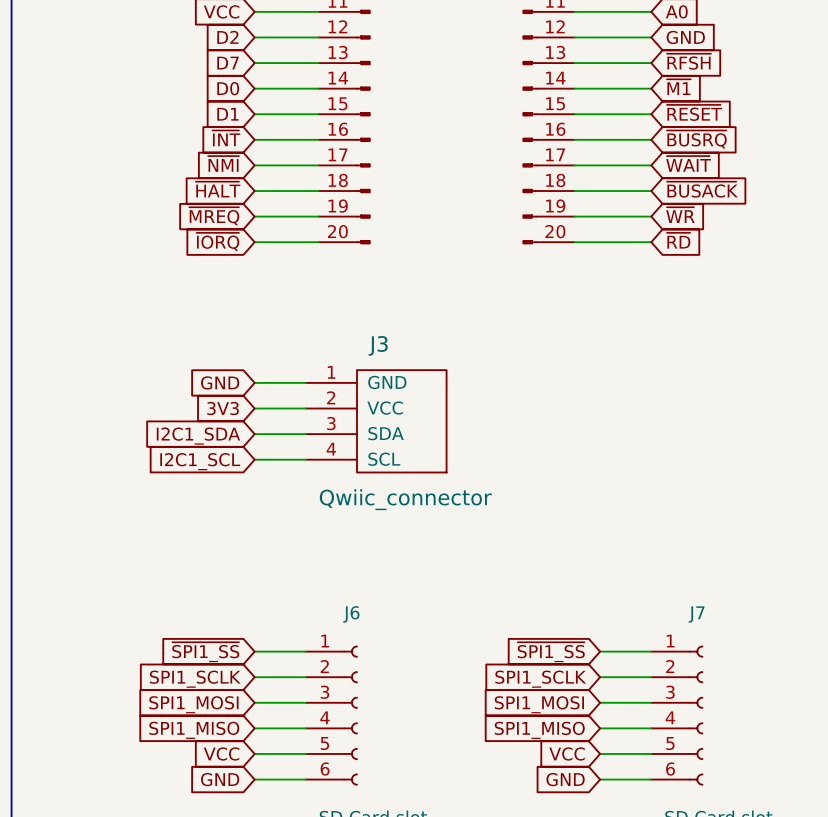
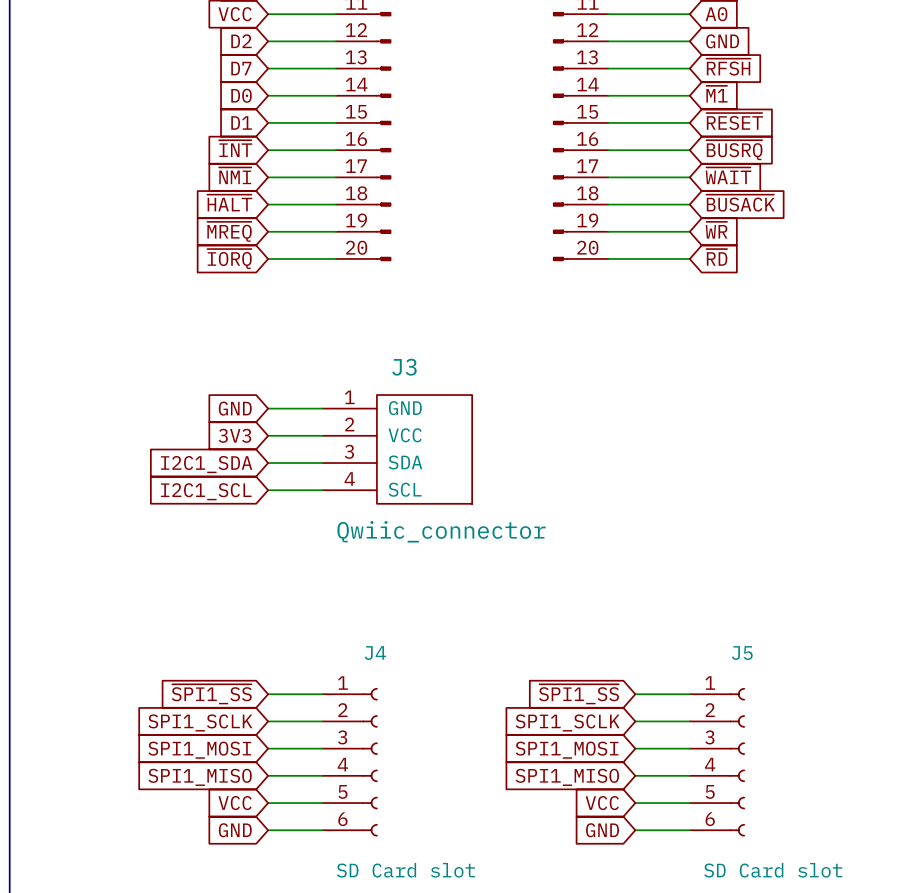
J6 name: J6 (351, 614) -> J4 (375, 653)
J7 name: J7 (696, 614) -> J5 (742, 653)

